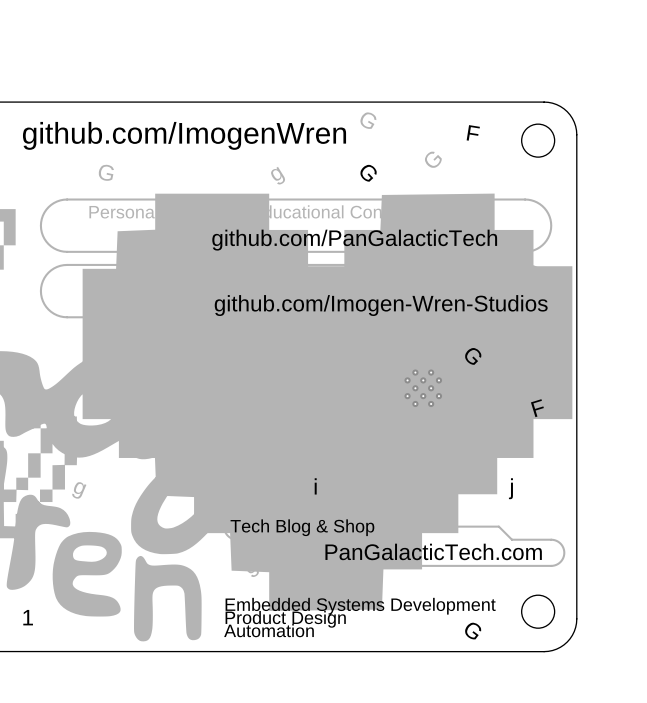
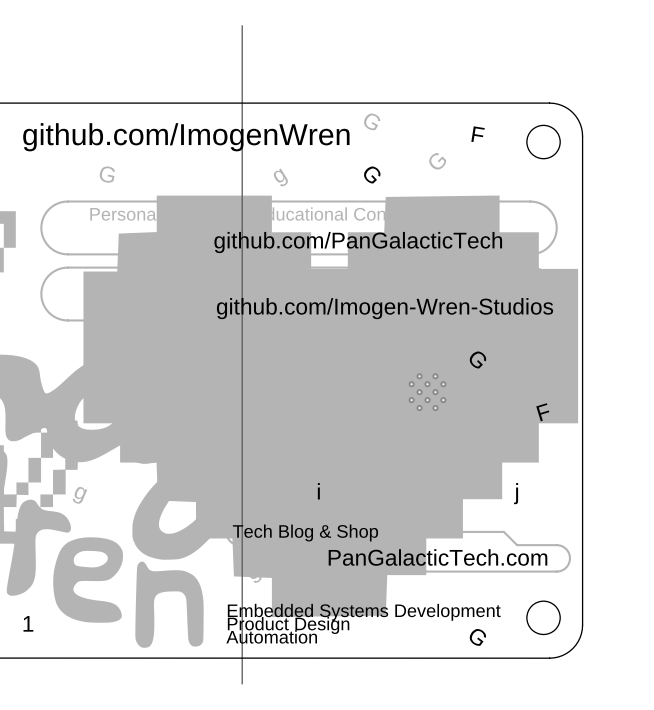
line: none -> (242, 25) (242, 683)

